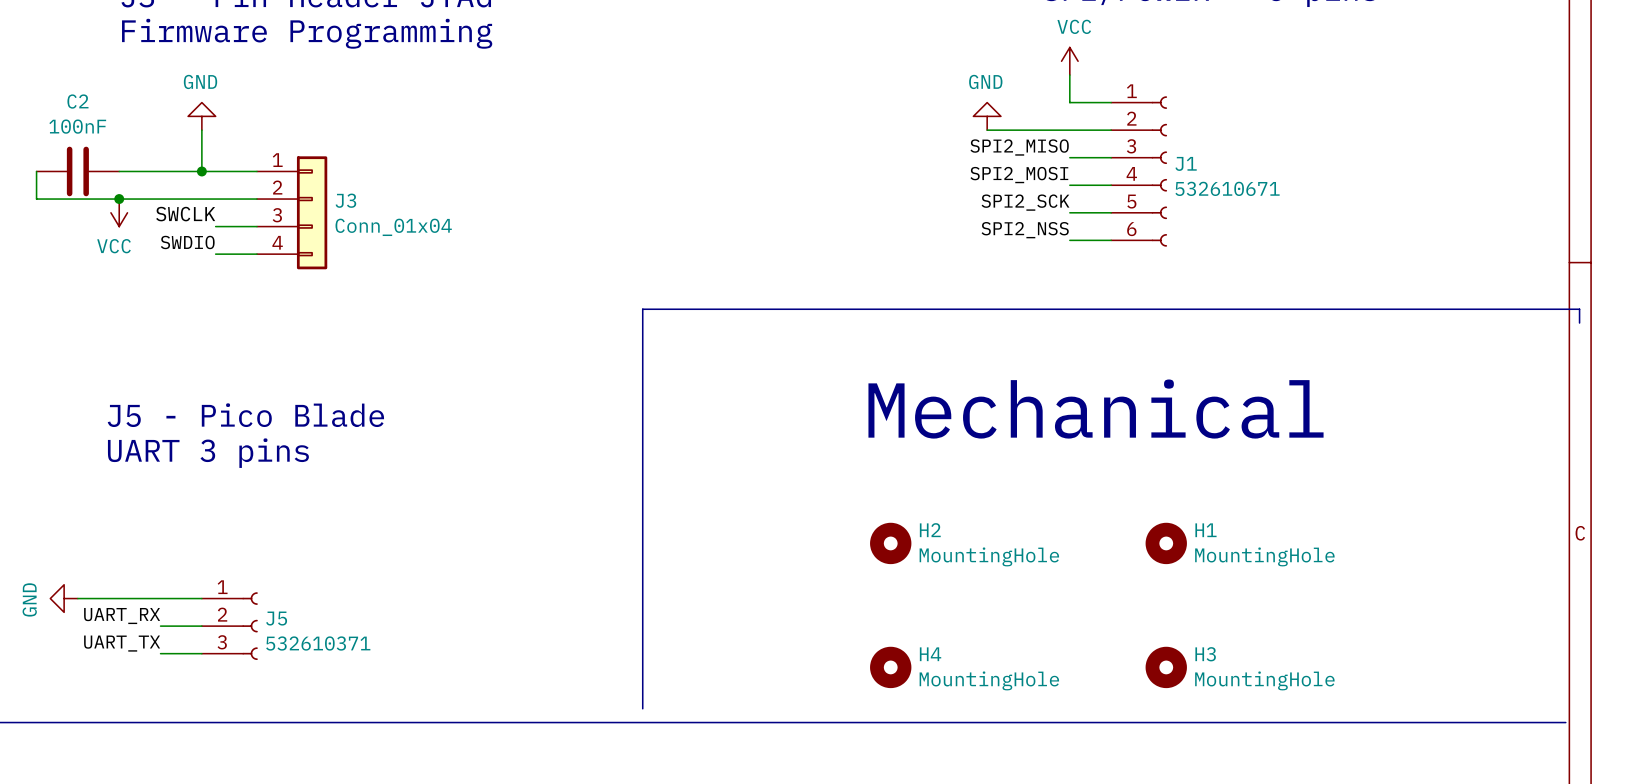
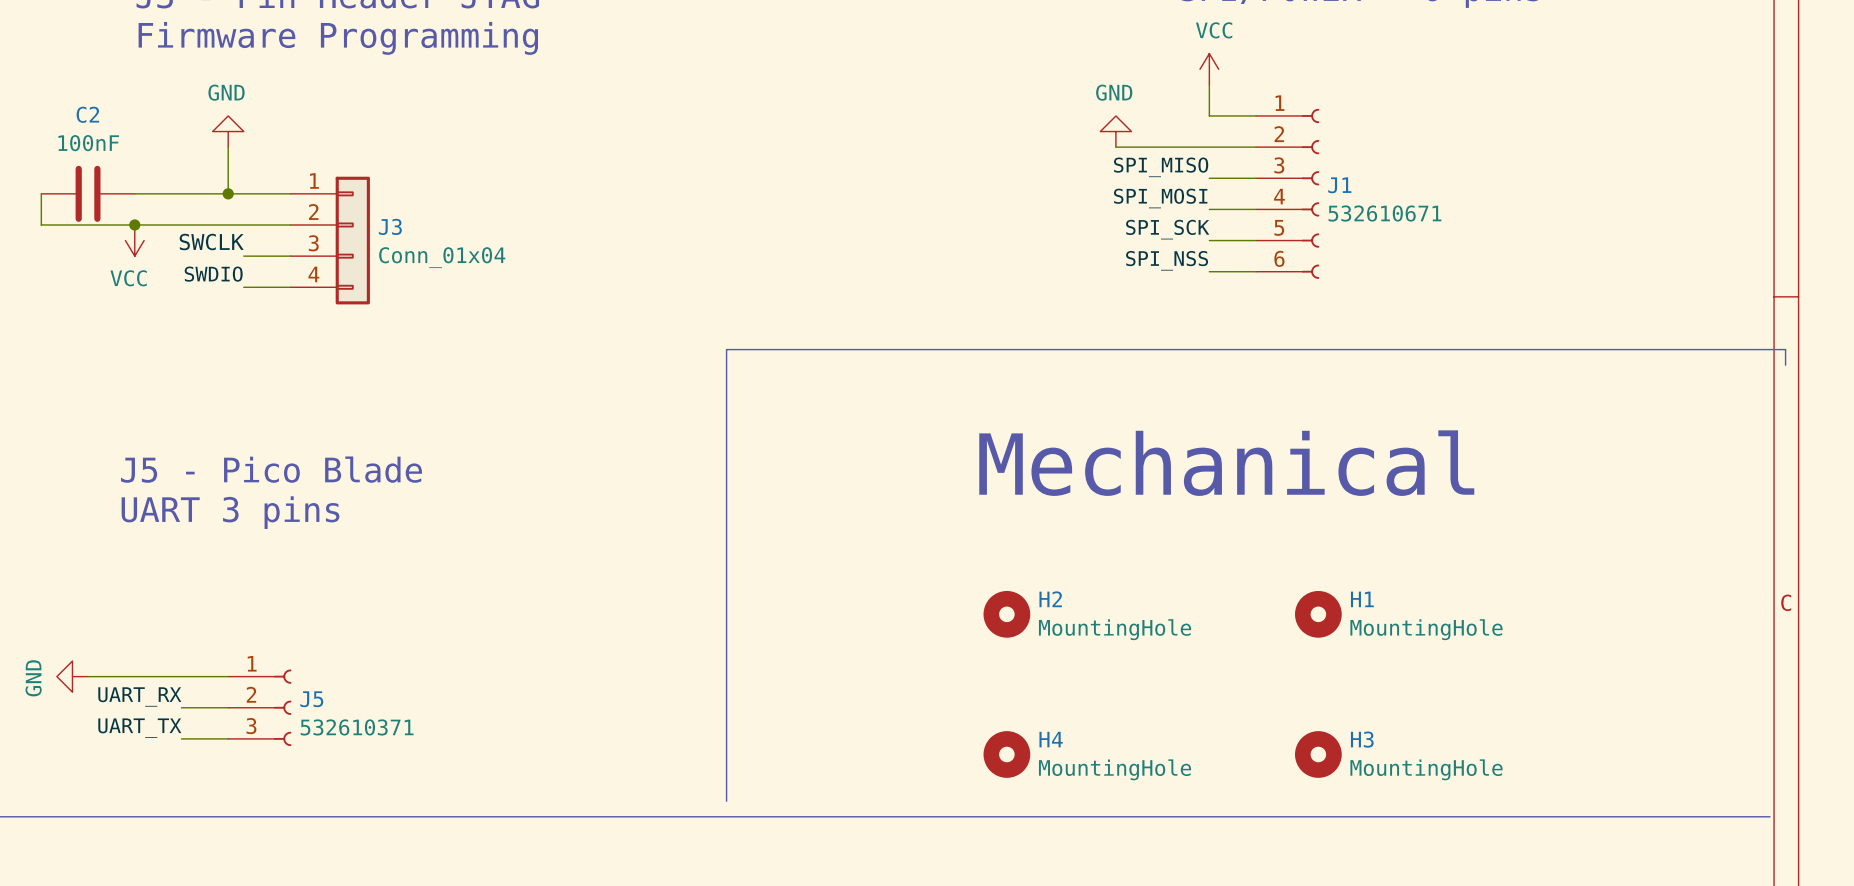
label: SPI2_MISO (1019, 147) -> SPI_MISO (1161, 167)
label: SPI2_MOSI (1019, 175) -> SPI_MOSI (1160, 198)
label: SPI2_SCK (1025, 202) -> SPI_SCK (1167, 229)
label: SPI2_NSS (1025, 230) -> SPI_NSS (1167, 260)

